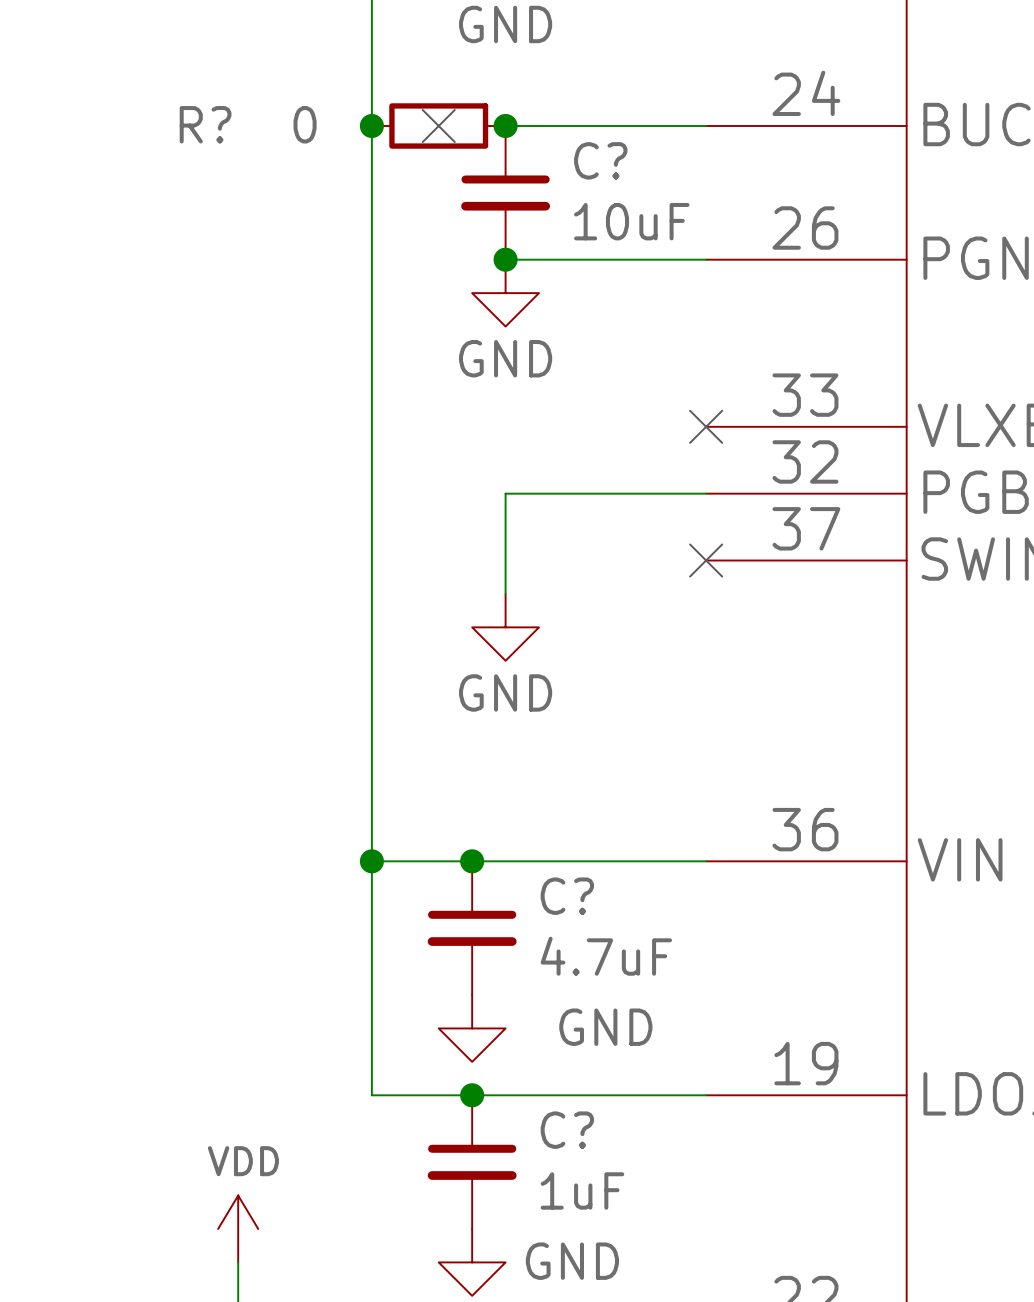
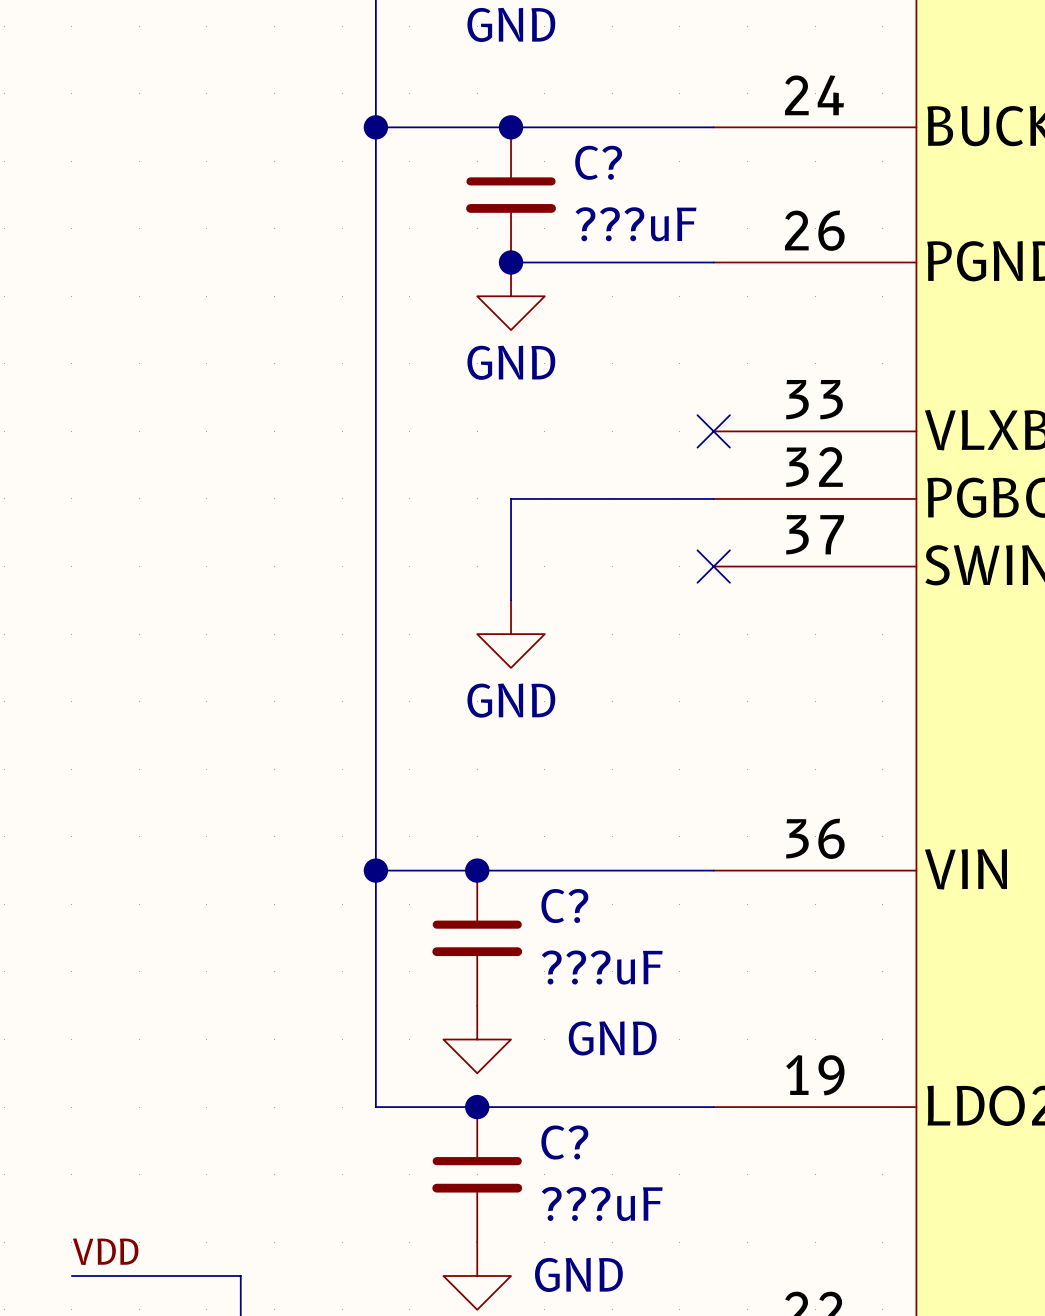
wire: none -> (375, 127) (511, 127)
R?: 0 (438, 126) -> none
no-connect mark: (438, 126) -> none
C? value: 10uF (631, 221) -> ???uF (635, 224)
C? value: 4.7uF (606, 956) -> ???uF (602, 967)
C? value: 1uF (582, 1190) -> ???uF (602, 1204)
part: VDD (238, 1228) -> none
label: none -> VDD (105, 1251)
wire: none -> (71, 1275) (240, 1275)

